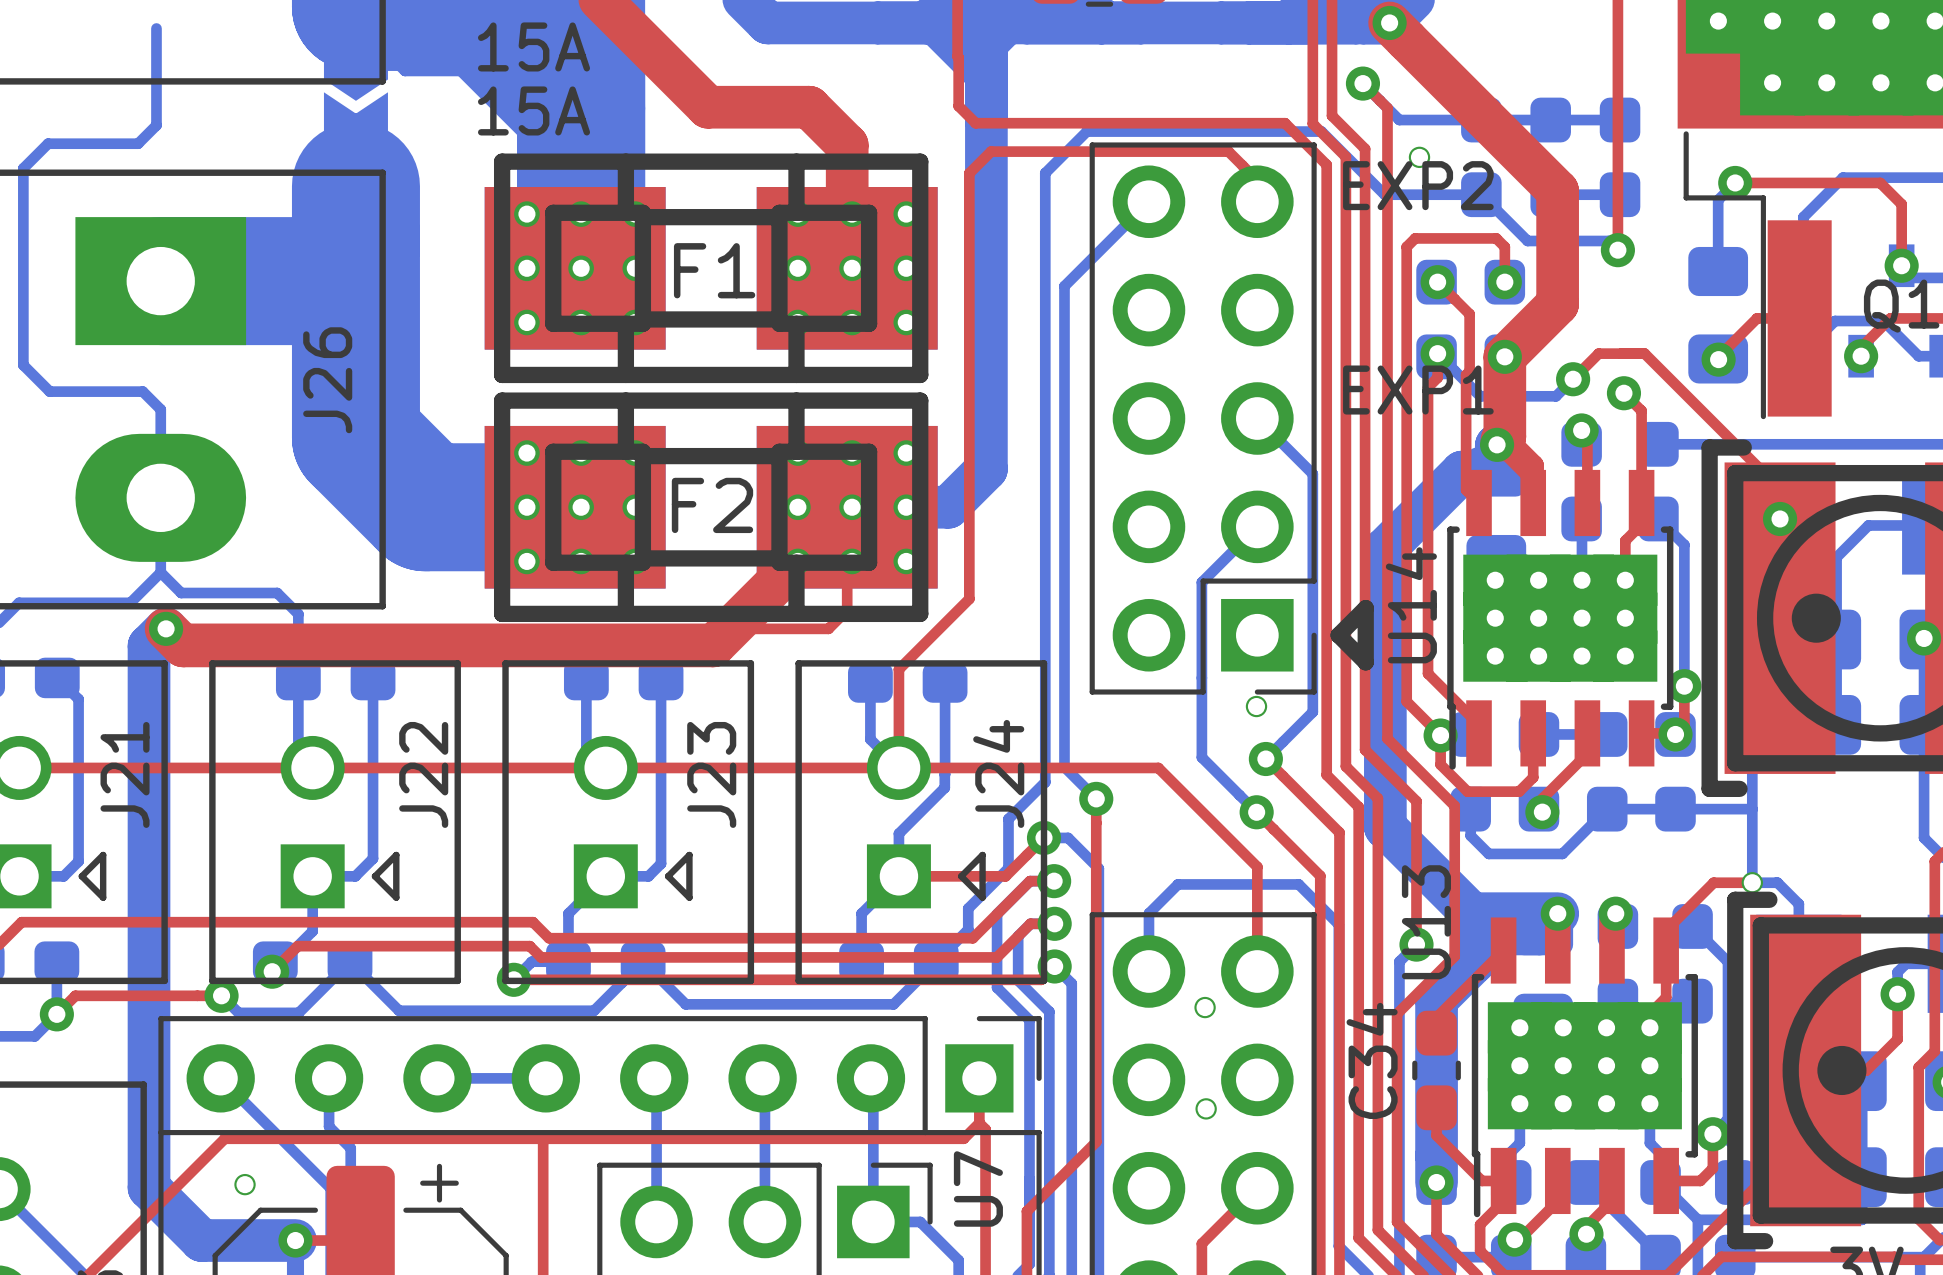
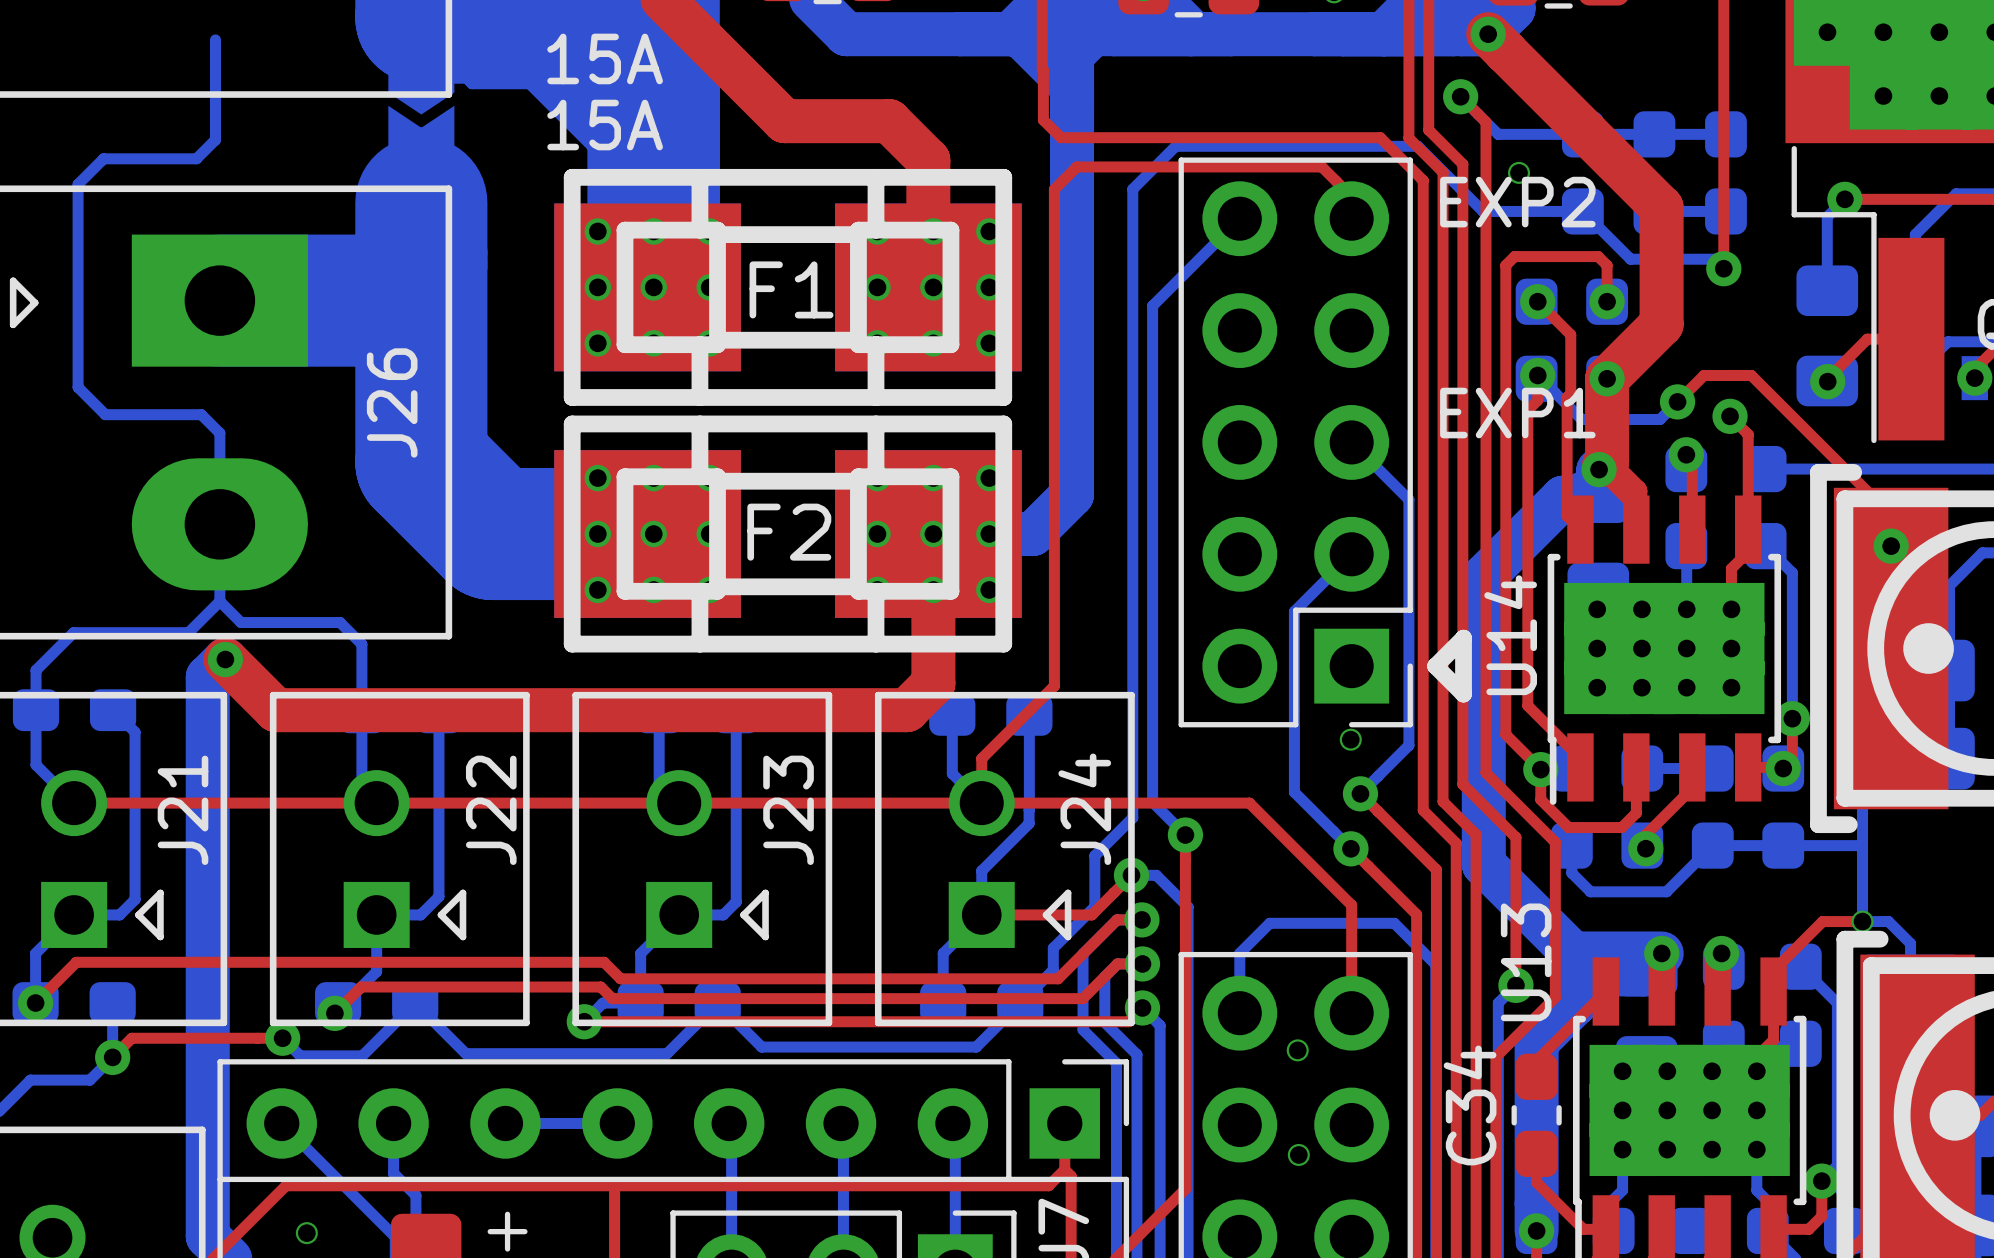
top track: (847, 507) (847, 610) (828, 628) (166, 628) -> none
top track: (852, 507) (713, 645) (183, 645) -> (933, 534) (933, 683) (906, 710) (276, 710) (243, 677)
top track: (969, 598) (898, 669) (898, 724) -> (1054, 628) (1054, 685) (981, 758)

